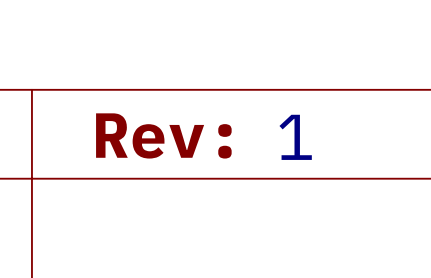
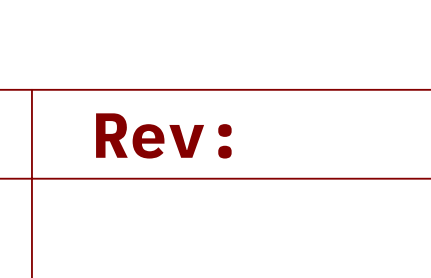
text: 1 (295, 137) -> none

